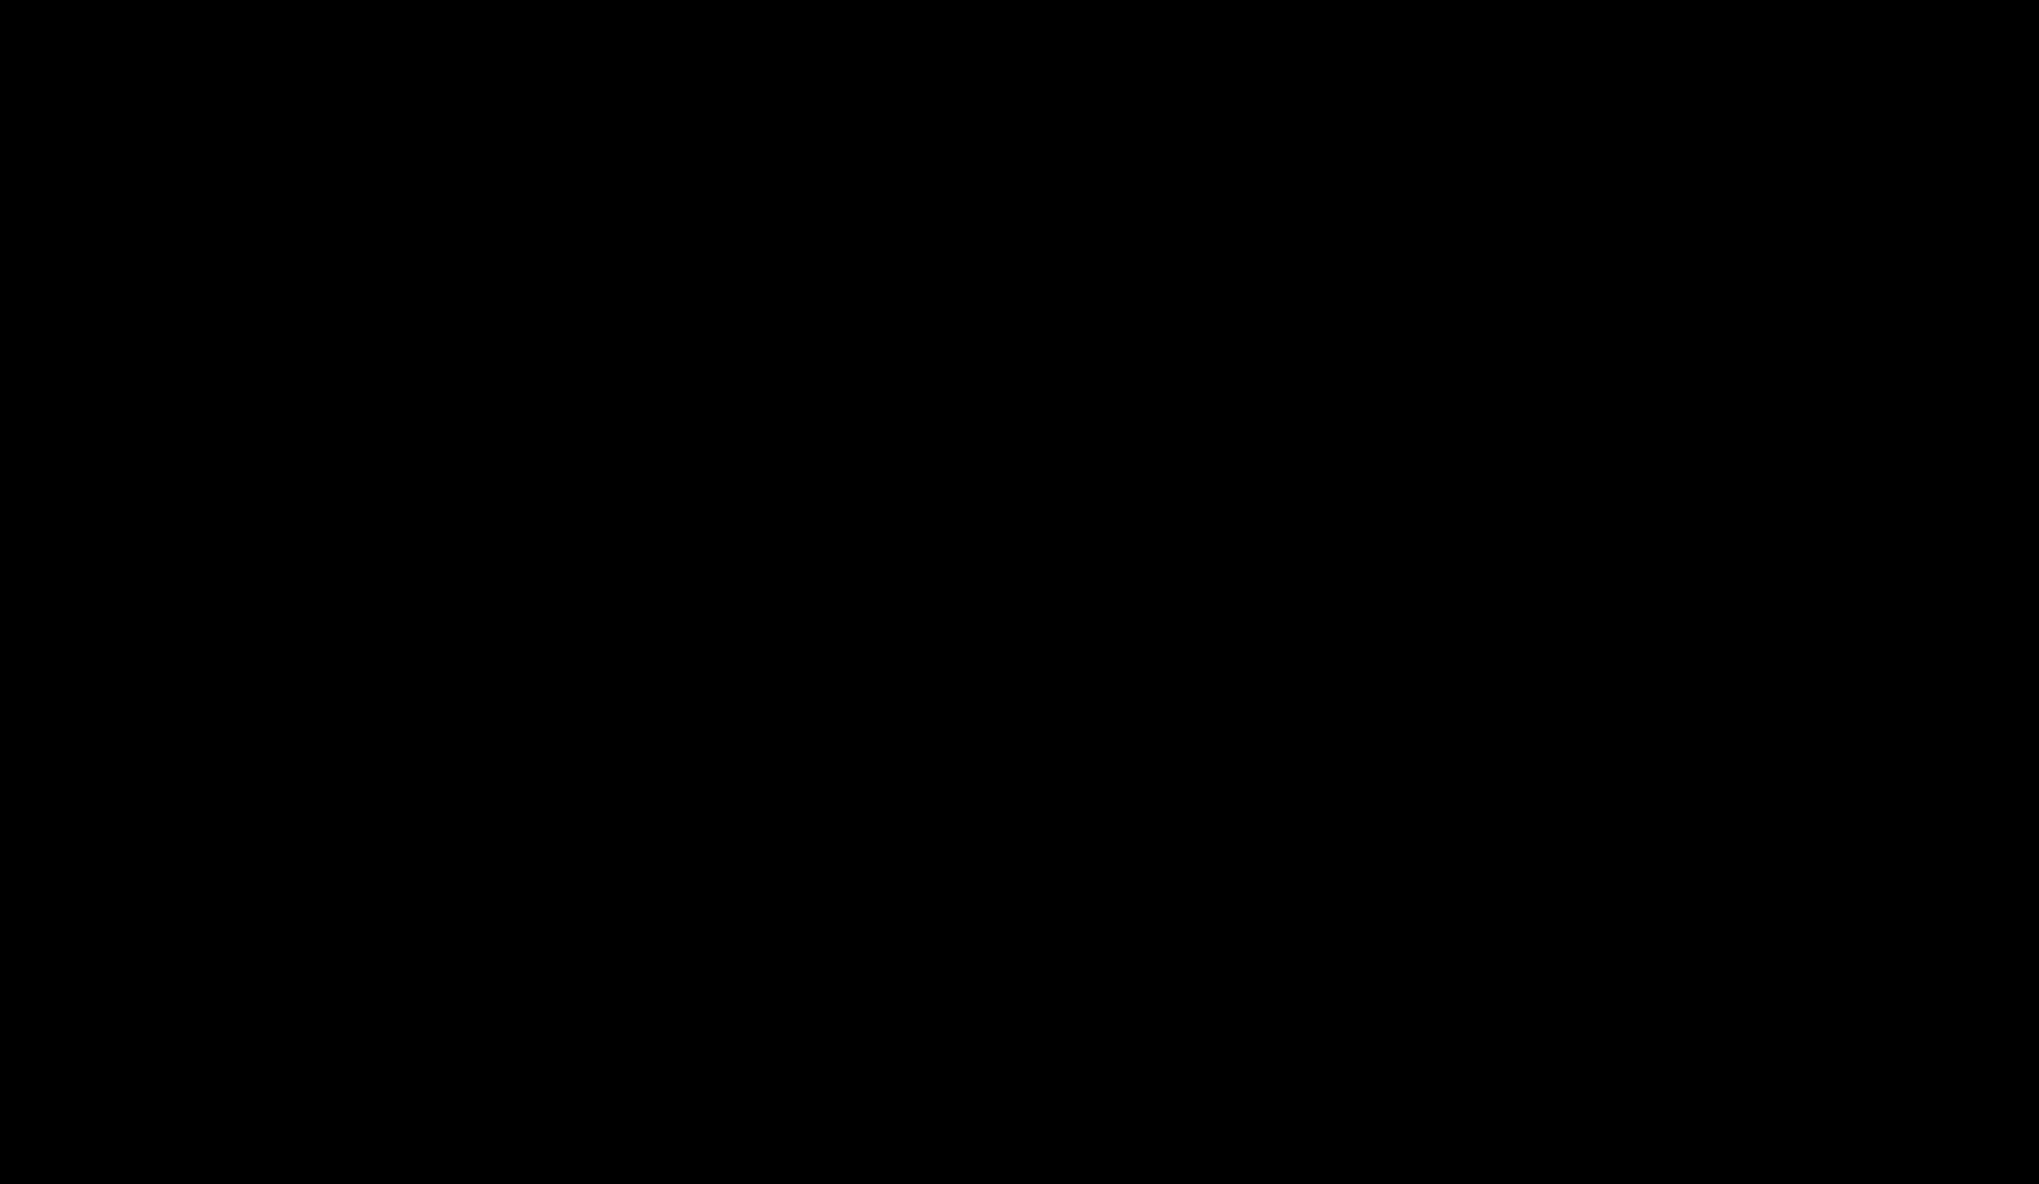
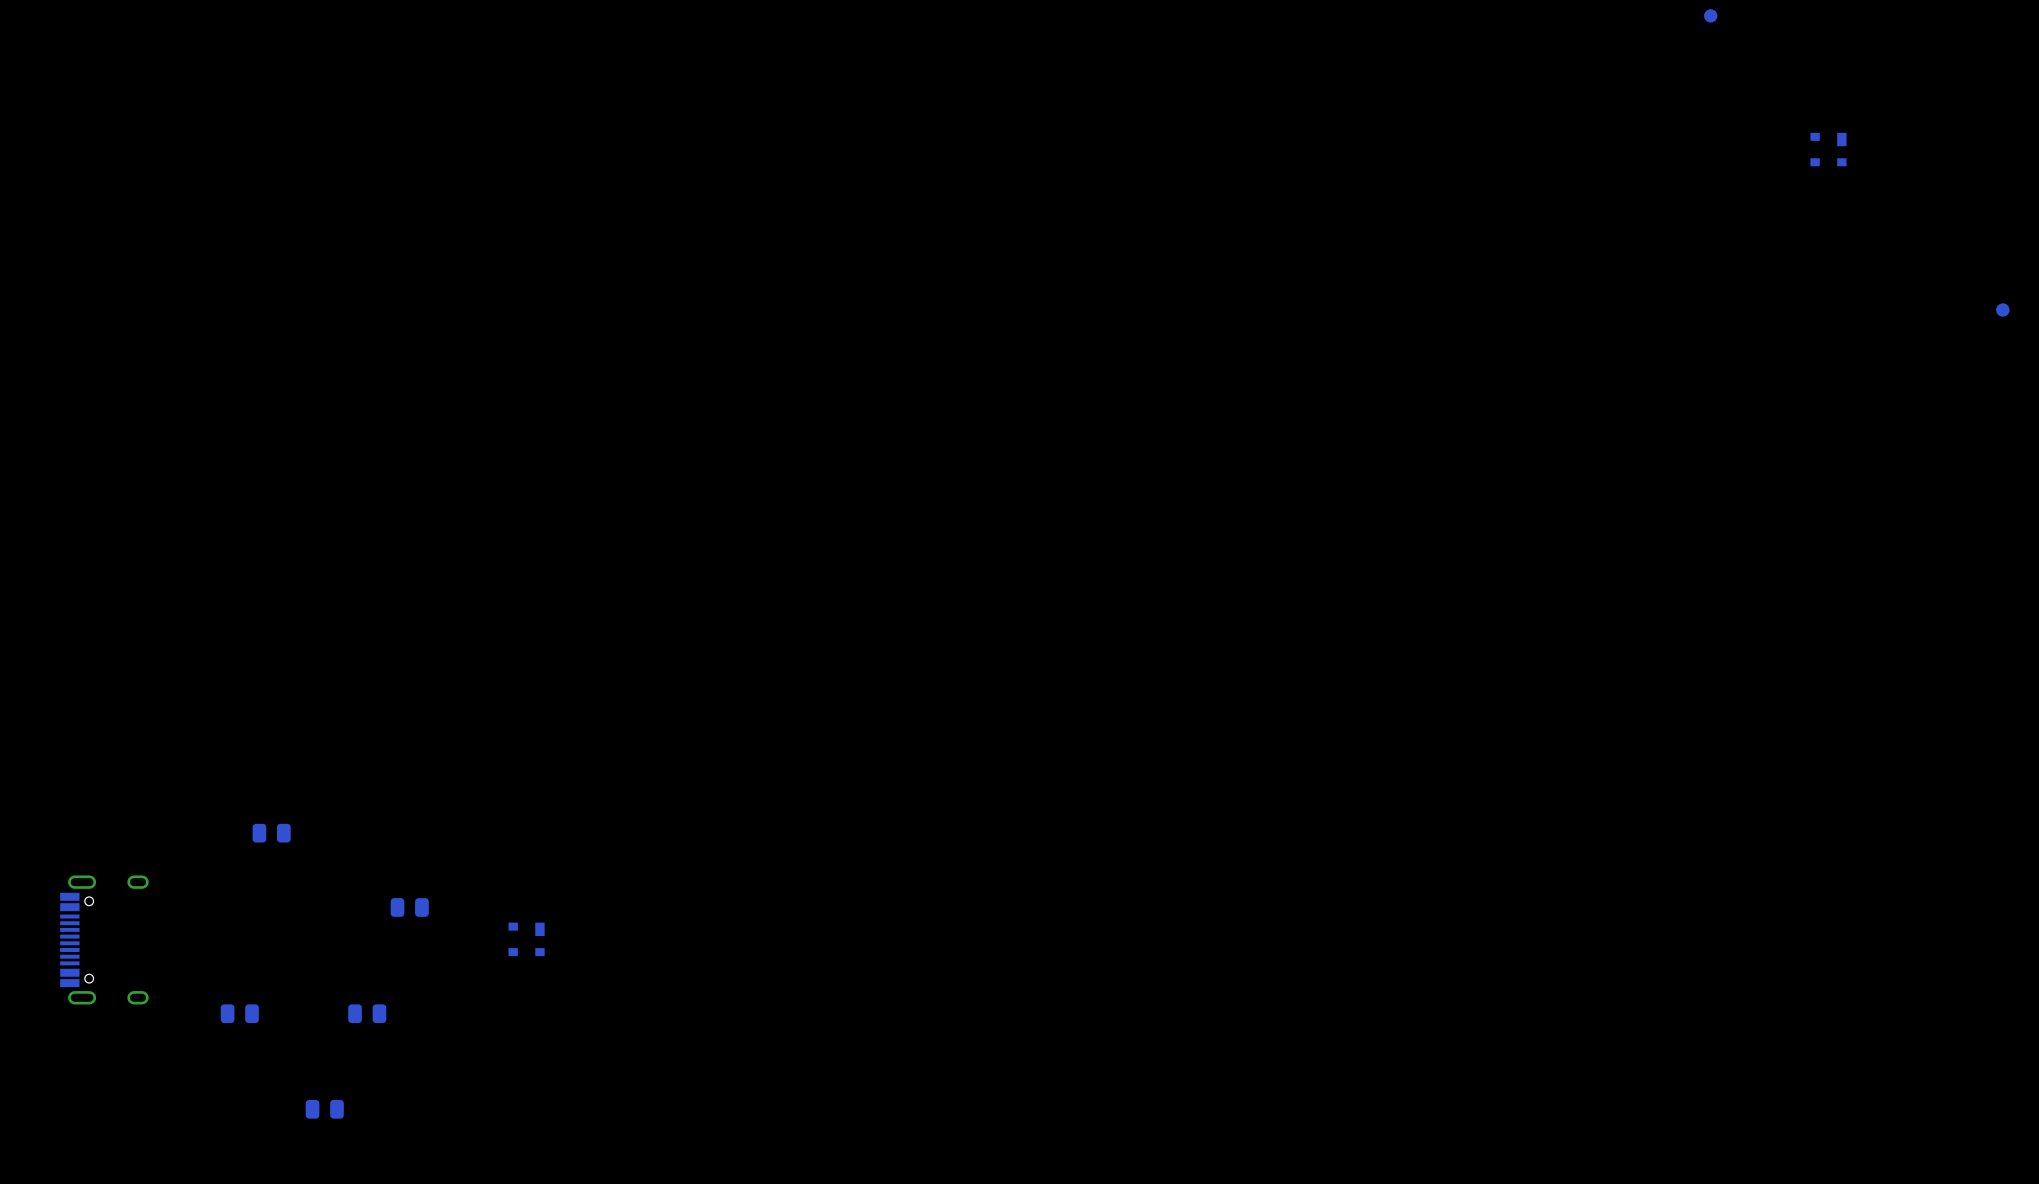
part: none -> (1710, 15)
part: none -> (1828, 149)
part: none -> (2002, 310)
part: none -> (271, 833)
part: none -> (409, 907)
part: none -> (104, 939)
part: none -> (526, 939)
part: none -> (239, 1013)
part: none -> (367, 1013)
part: none -> (324, 1109)

